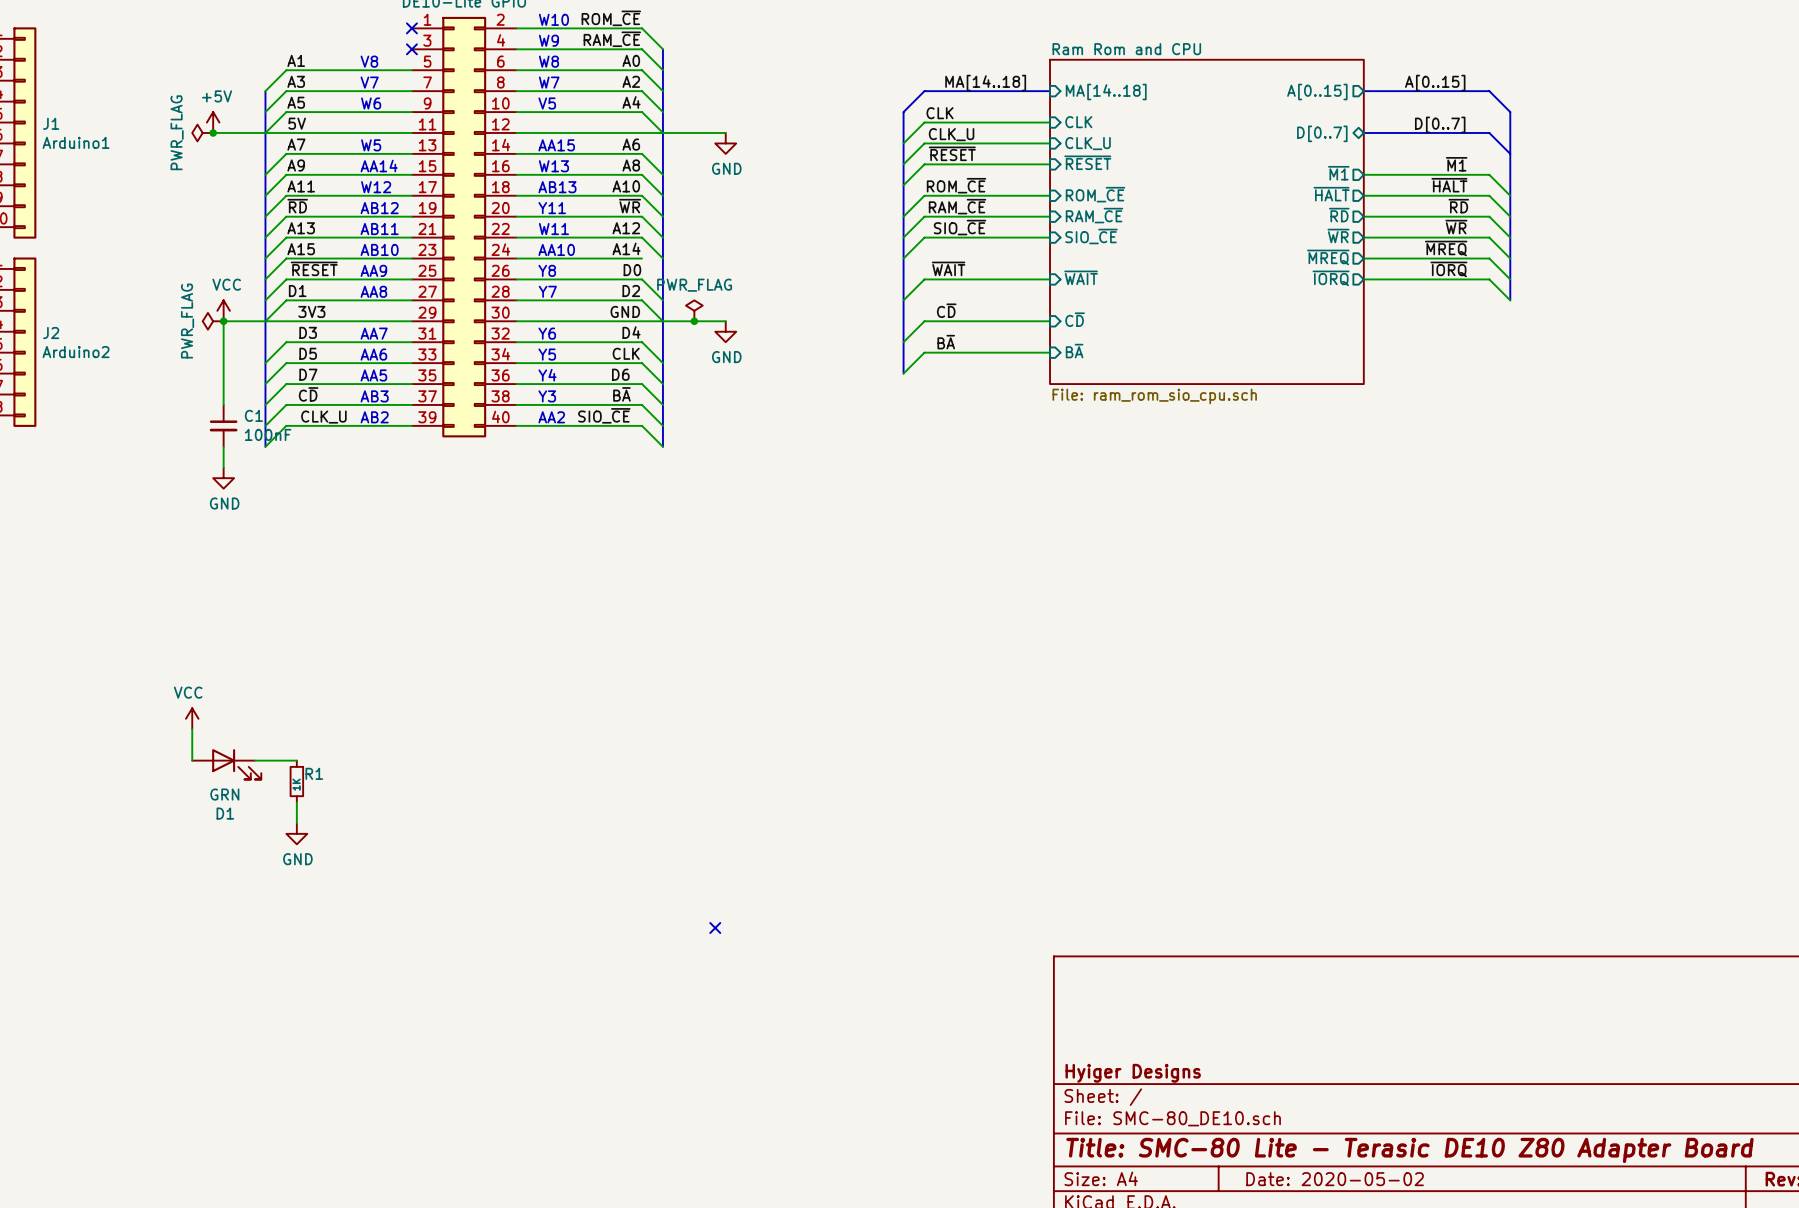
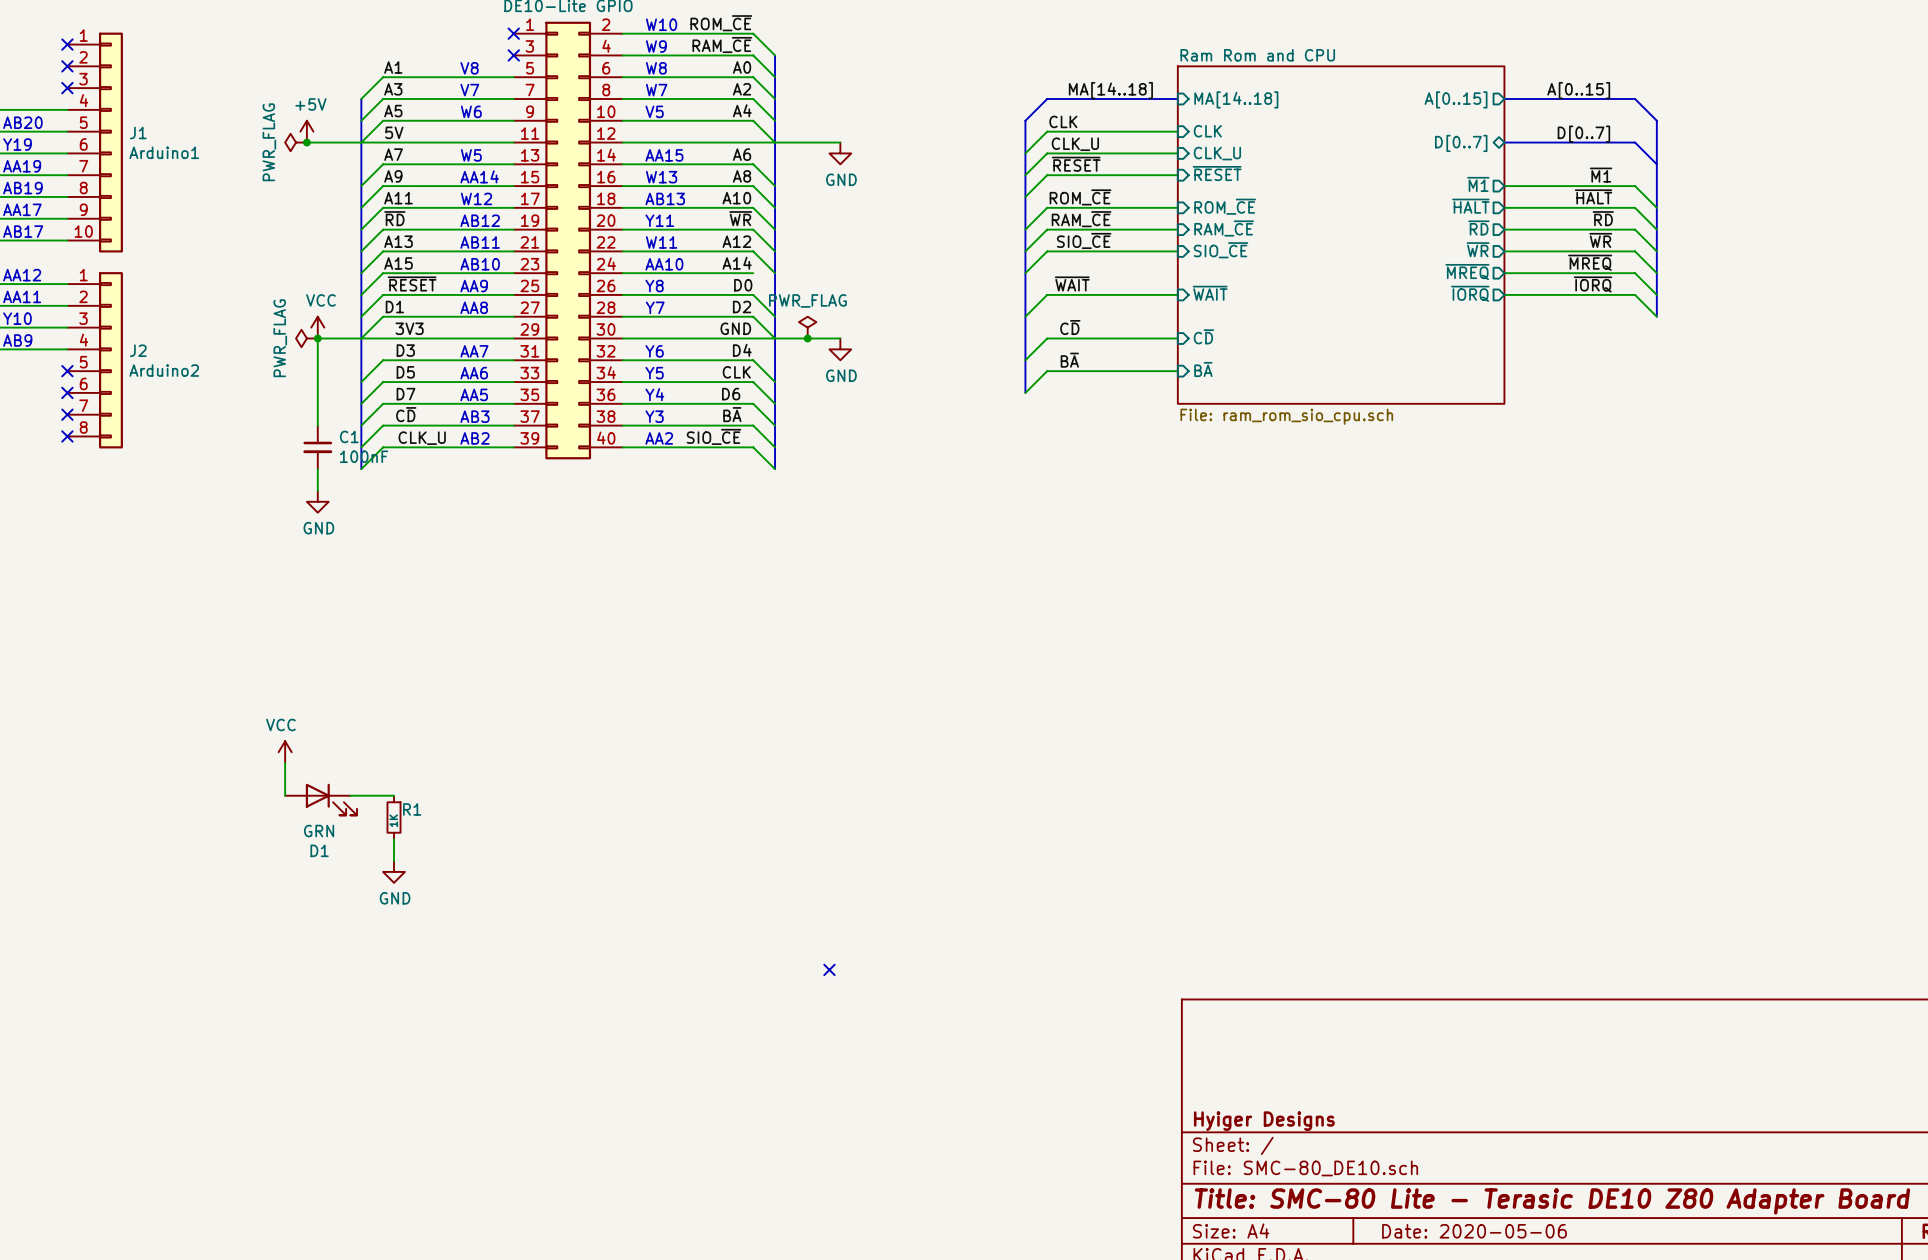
title block: Date: 2020-05-02 (1335, 1179) -> Date: 2020-05-06 (1474, 1231)

